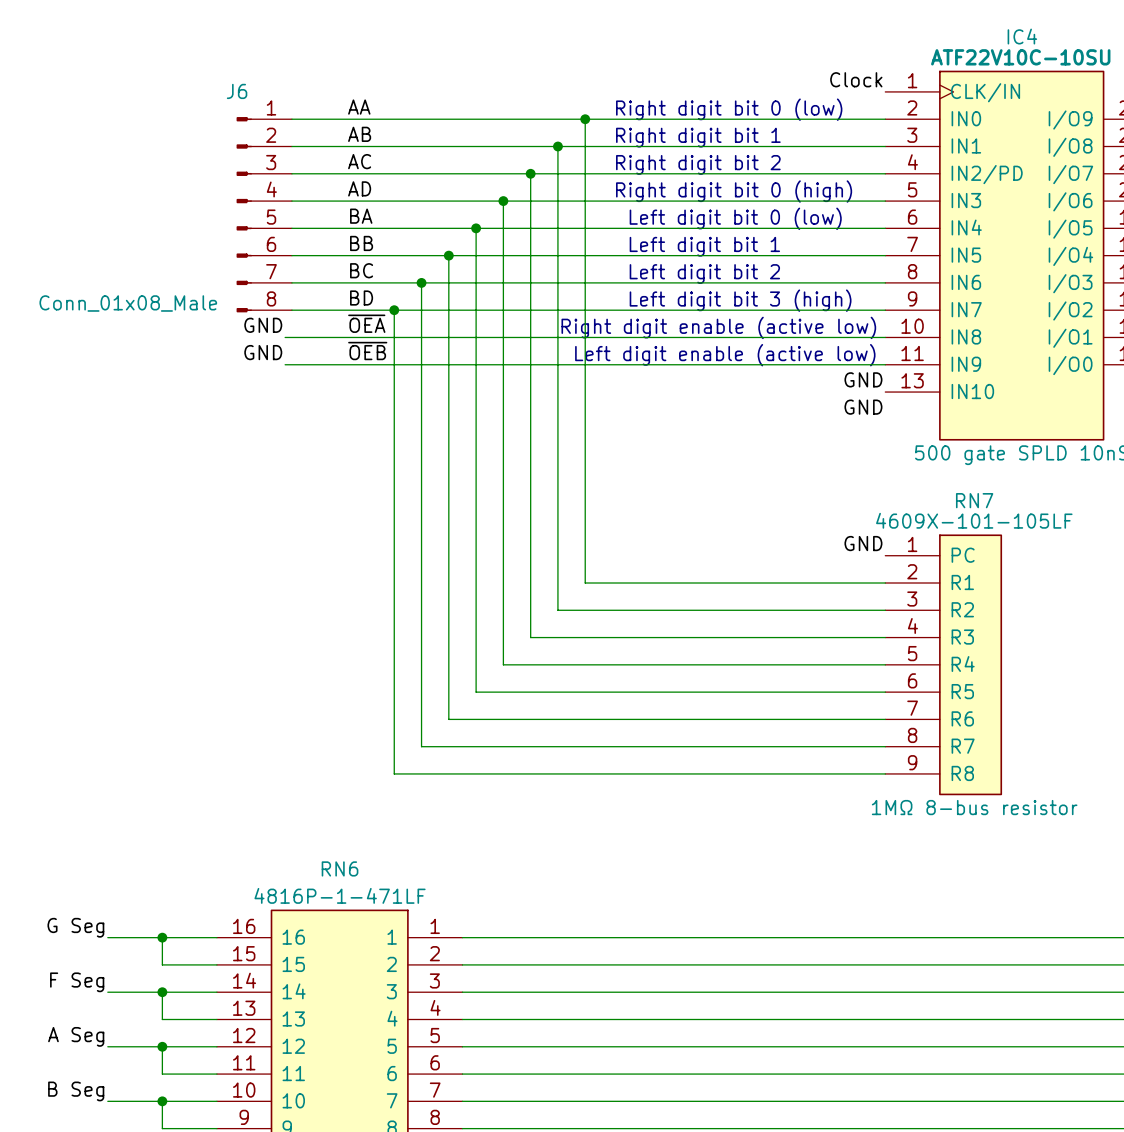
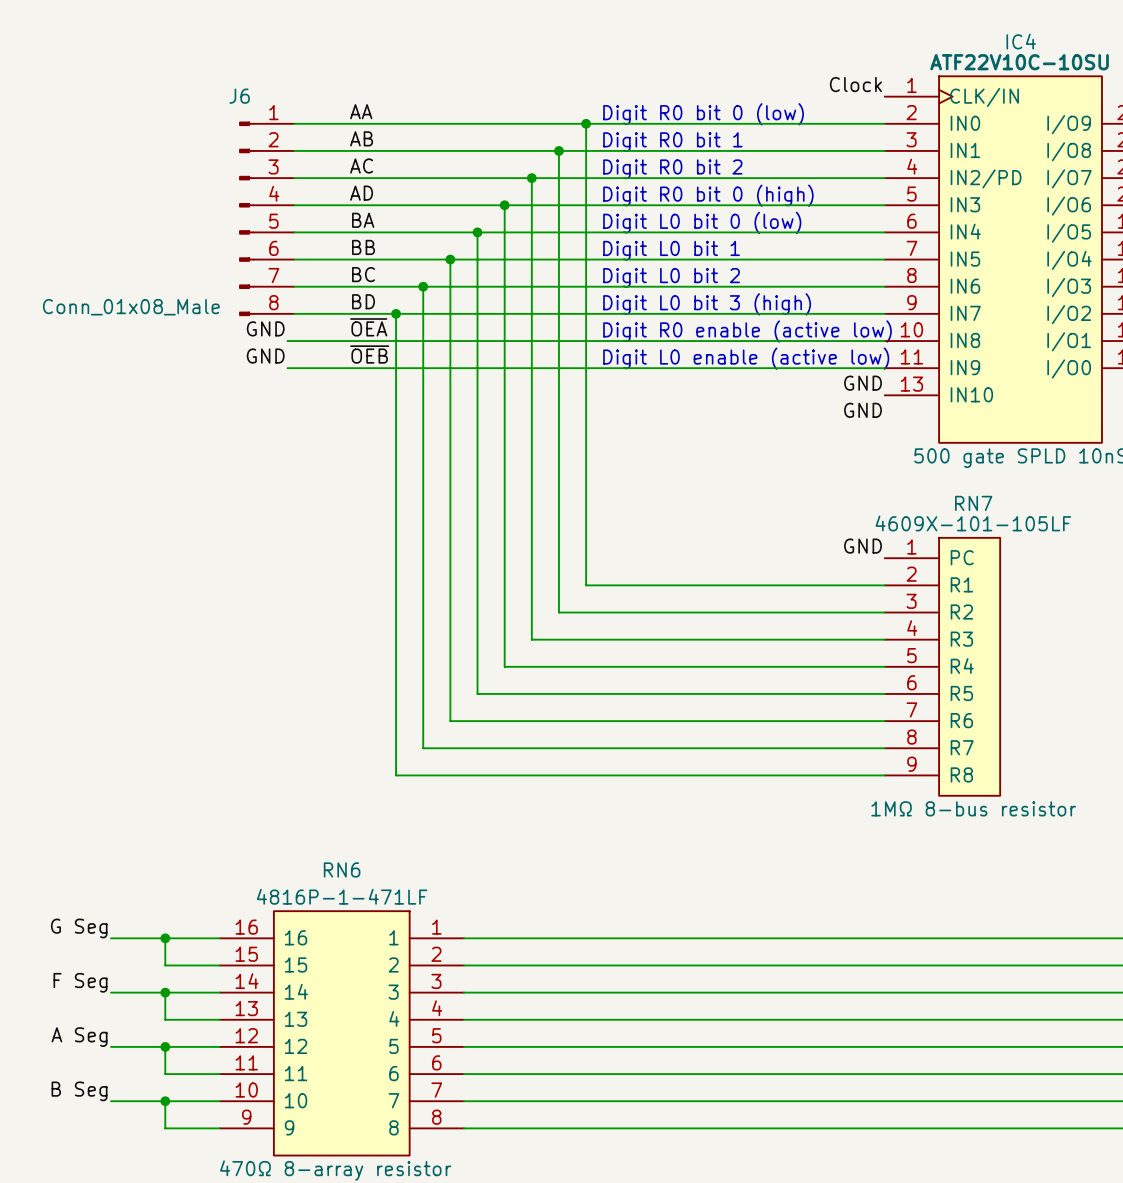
text: Right digit bit 0 (low) (729, 109) -> Digit R0 bit 0 (low) (703, 114)
text: Right digit bit 1 (698, 137) -> Digit R0 bit 1 (672, 142)
text: Right digit bit 2 (698, 164) -> Digit R0 bit 2 (672, 169)
text: Right digit bit 0 (high) (734, 191) -> Digit R0 bit 0 (high) (708, 195)
text: none -> Digit L0 bit 0 (low) (702, 222)
text: Left digit bit 0 (low) (735, 218) -> none
text: Left digit bit 1 (704, 246) -> Digit L0 bit 1 (671, 250)
text: Left digit bit 2 (704, 274) -> Digit L0 bit 2 (671, 277)
text: Left digit bit 3 (high) (740, 300) -> Digit L0 bit 3 (high) (707, 304)
text: Right digit enable (active low) (718, 327) -> none
text: none -> Digit R0 enable (active low) (747, 331)
text: Left digit enable (active low) (725, 355) -> none
text: none -> Digit L0 enable (active low) (746, 358)

